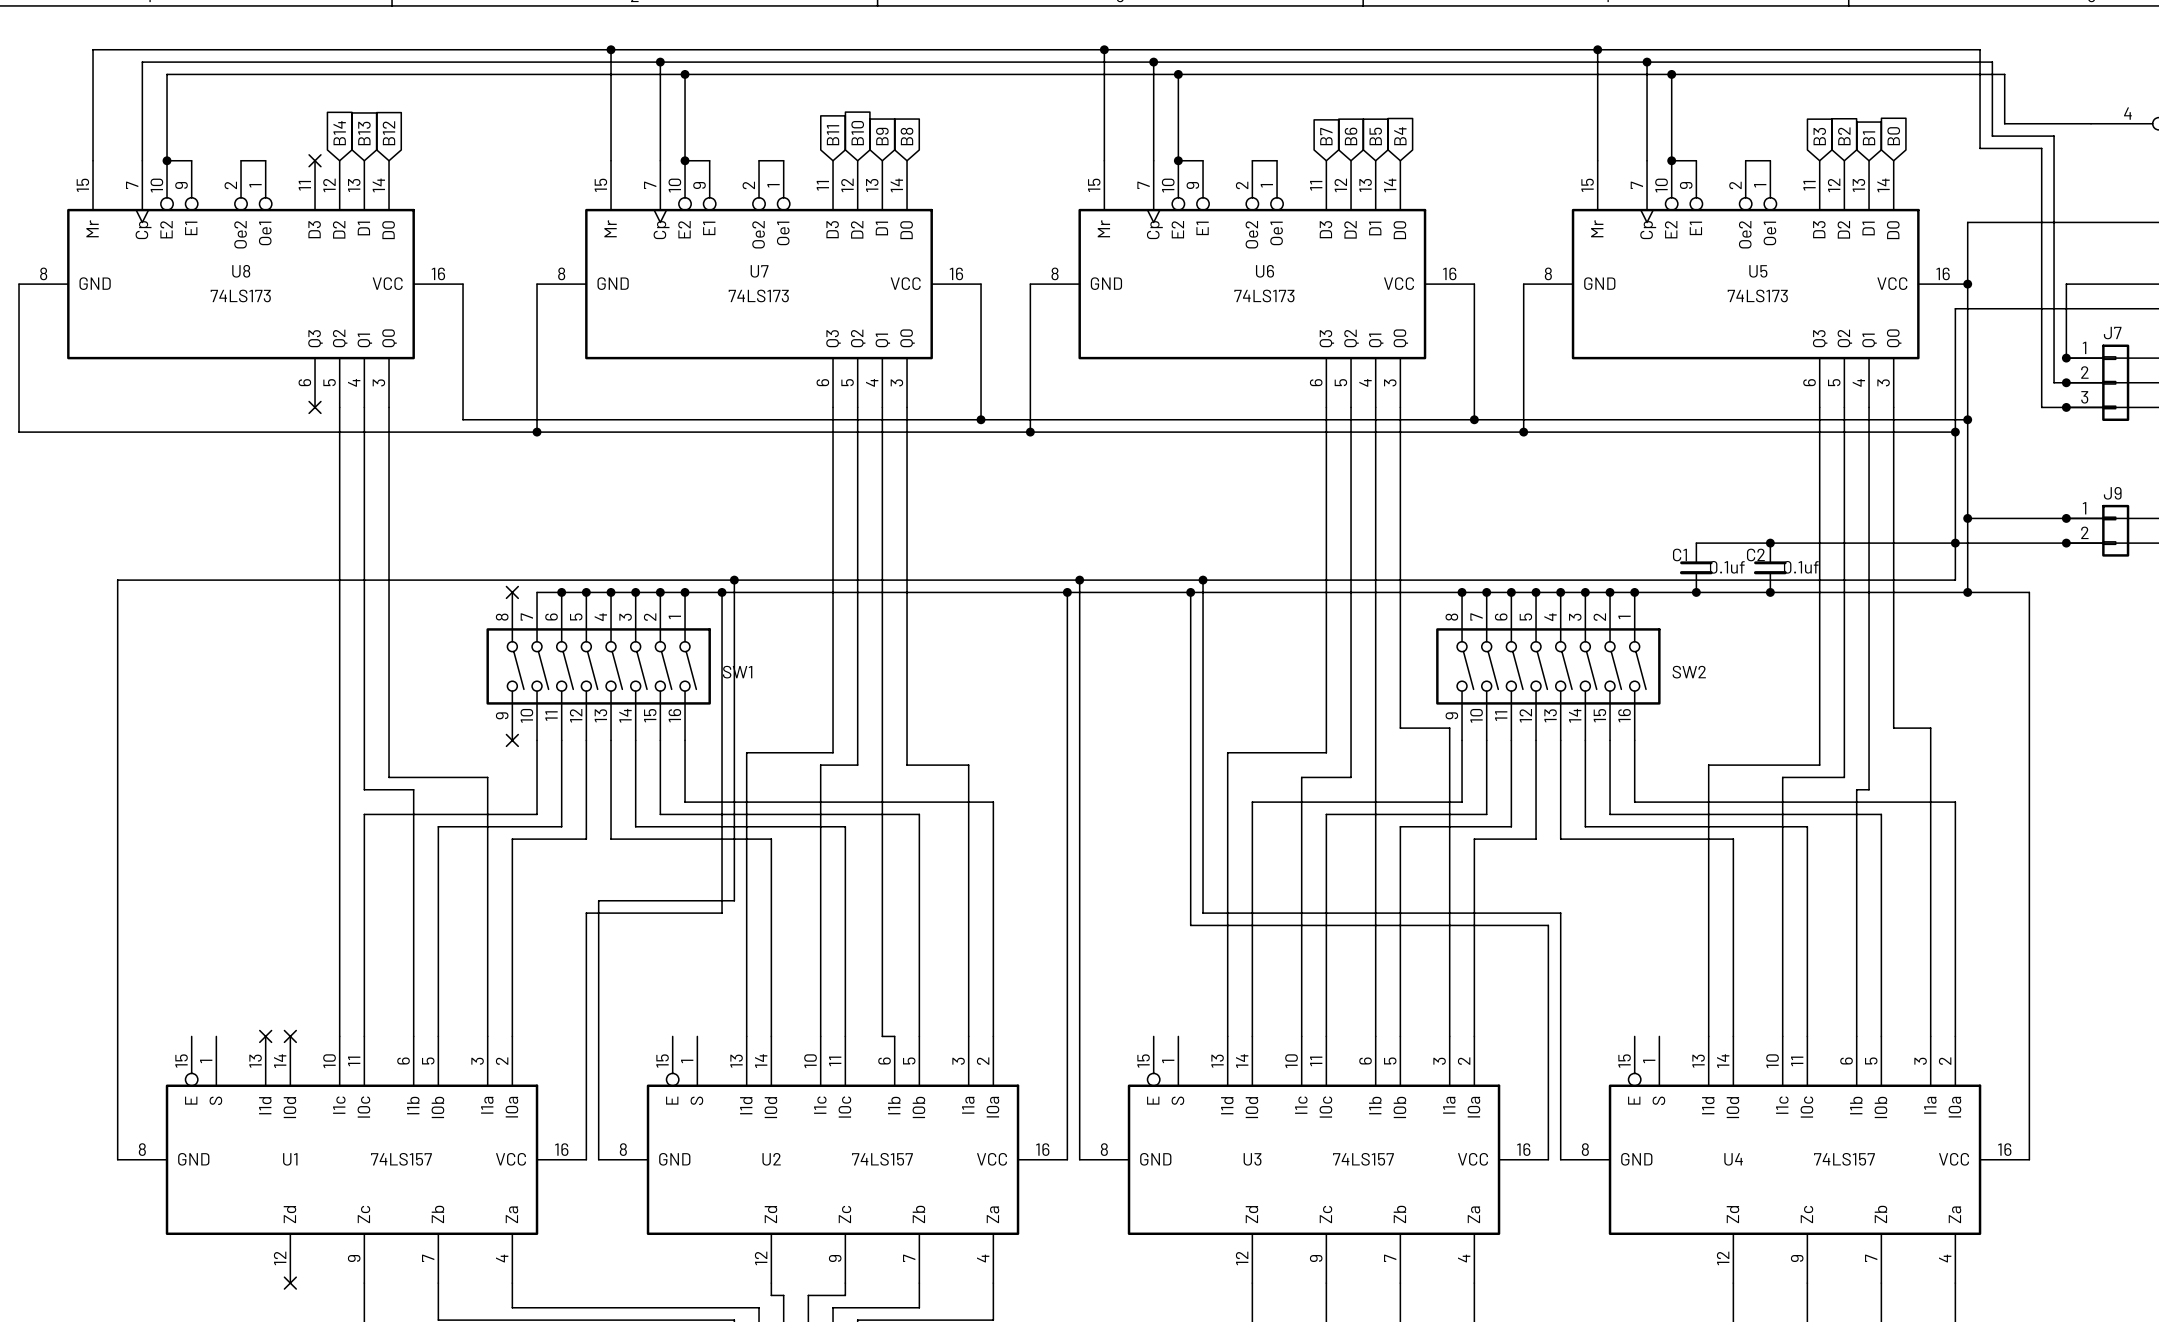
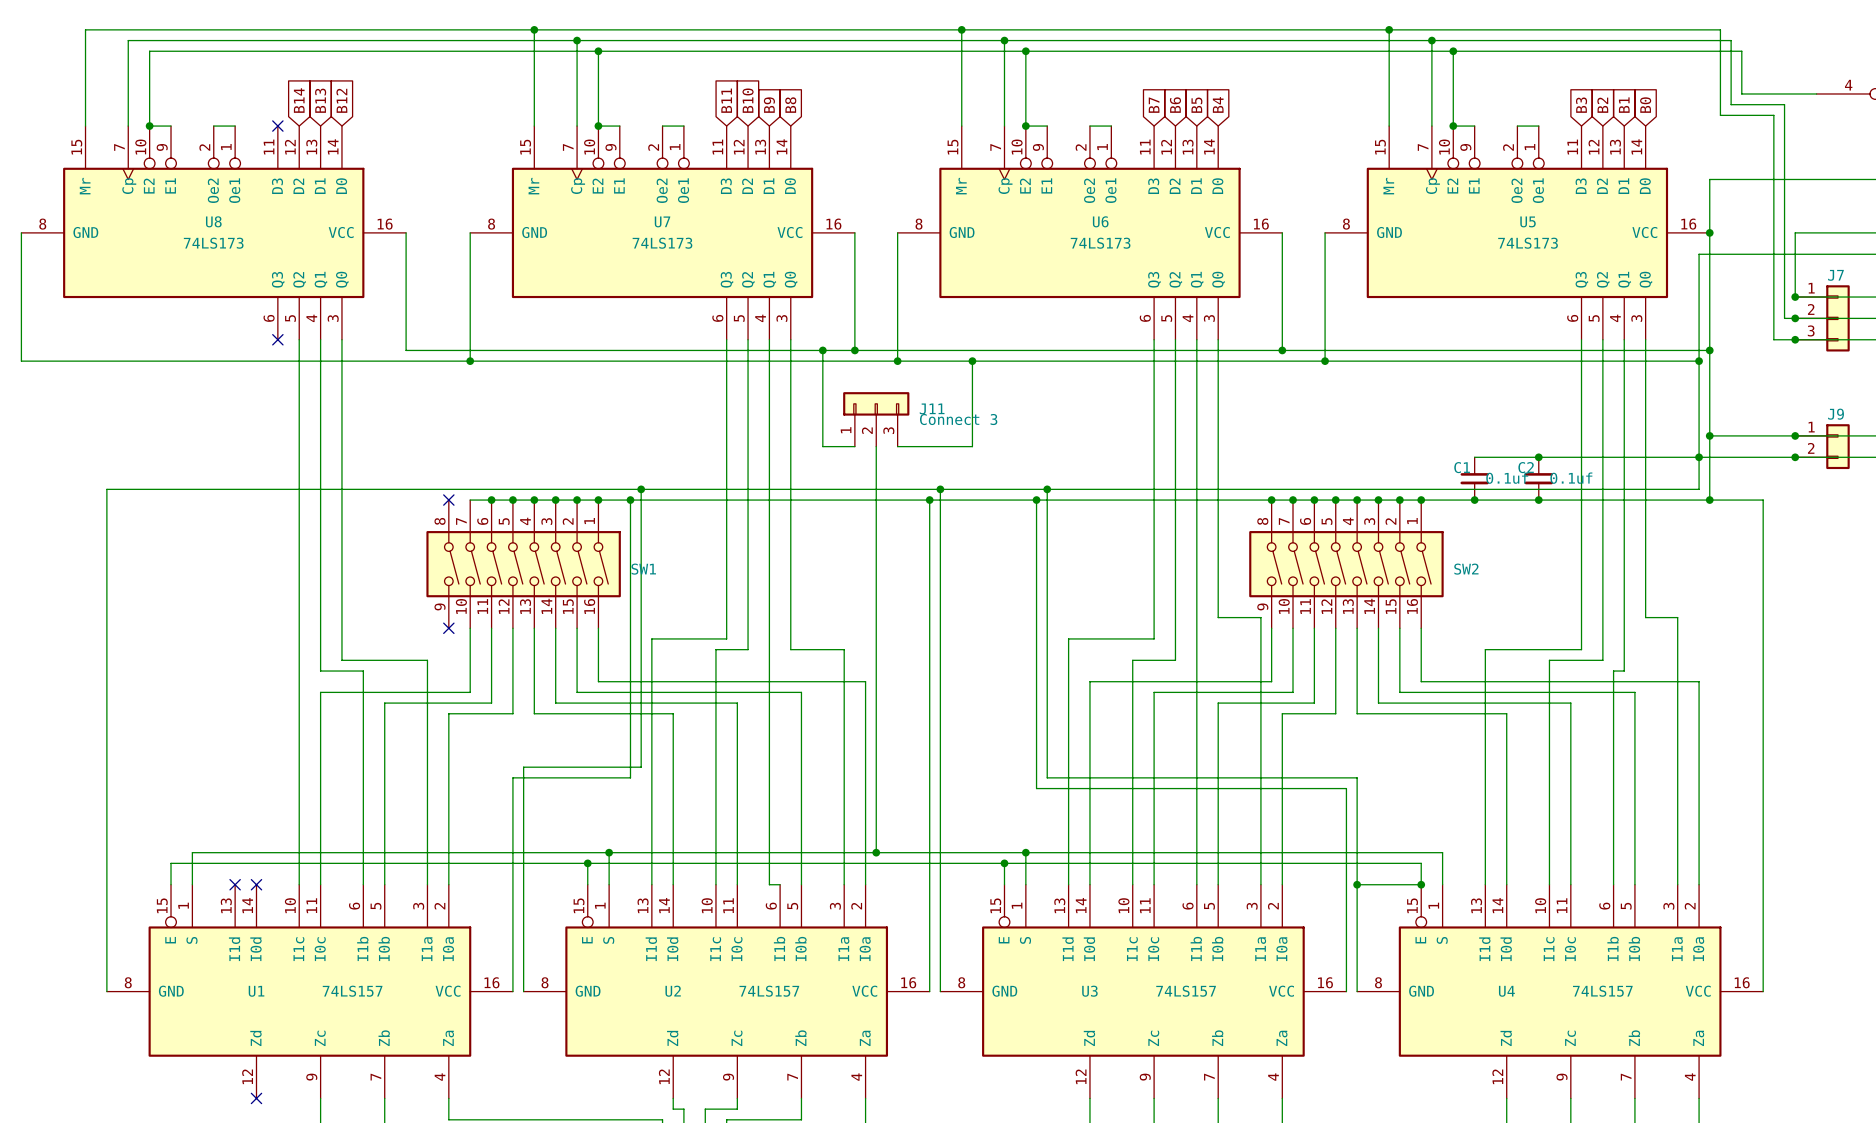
wire: none -> (822, 350) (822, 446) (854, 446)
junction: none -> (822, 350)
wire: none -> (972, 361) (972, 446) (897, 446)
junction: none -> (972, 361)
J11: none -> Connect 3 (876, 419)
wire: none -> (876, 446) (876, 852)
wire: none -> (609, 852) (609, 884)
junction: none -> (609, 852)
junction: none -> (876, 852)
wire: none -> (1025, 852) (1025, 884)
junction: none -> (1025, 852)
wire: none -> (587, 863) (587, 884)
junction: none -> (587, 863)
wire: none -> (1004, 863) (1004, 884)
junction: none -> (1004, 863)
wire: none -> (171, 884) (171, 863) (1421, 863) (1421, 884) (1357, 884)
wire: none -> (192, 884) (192, 852) (1442, 852) (1442, 884)
junction: none -> (1357, 884)
junction: none -> (1421, 884)

